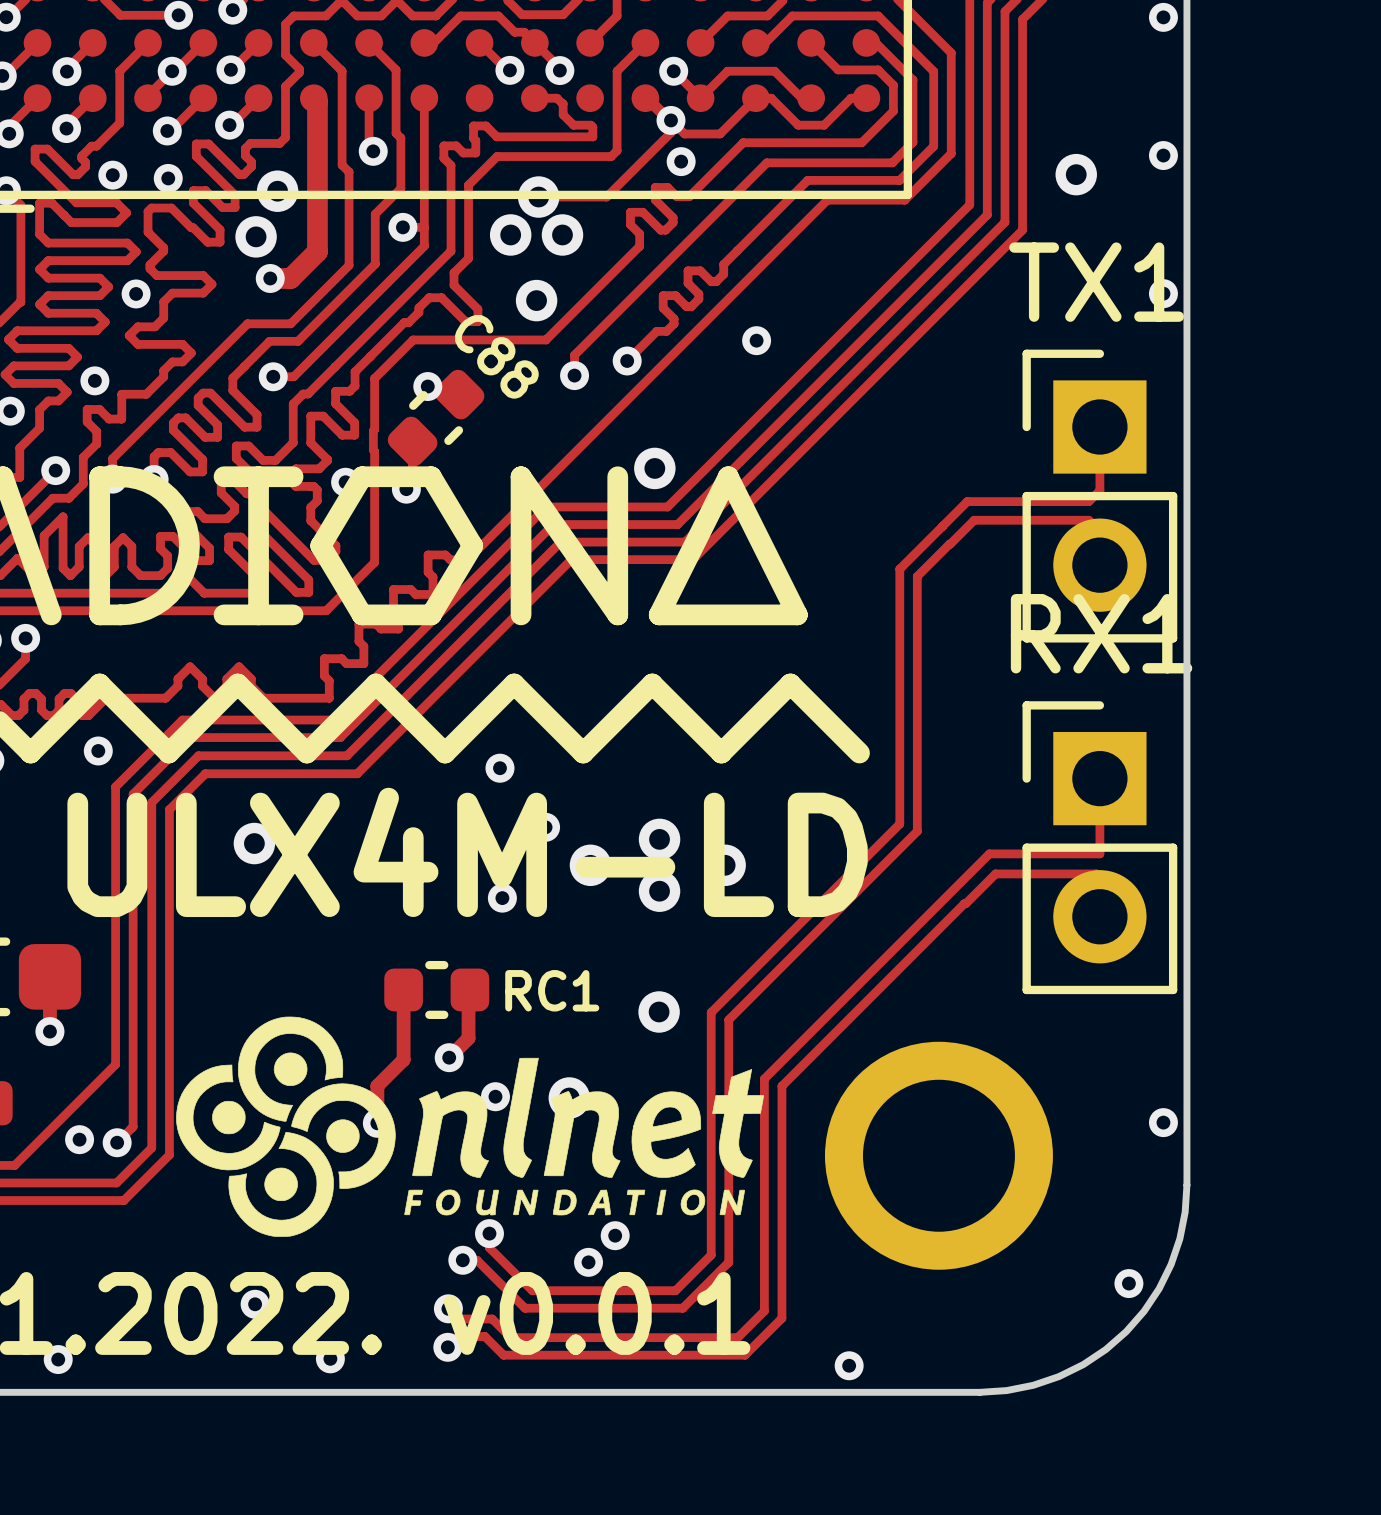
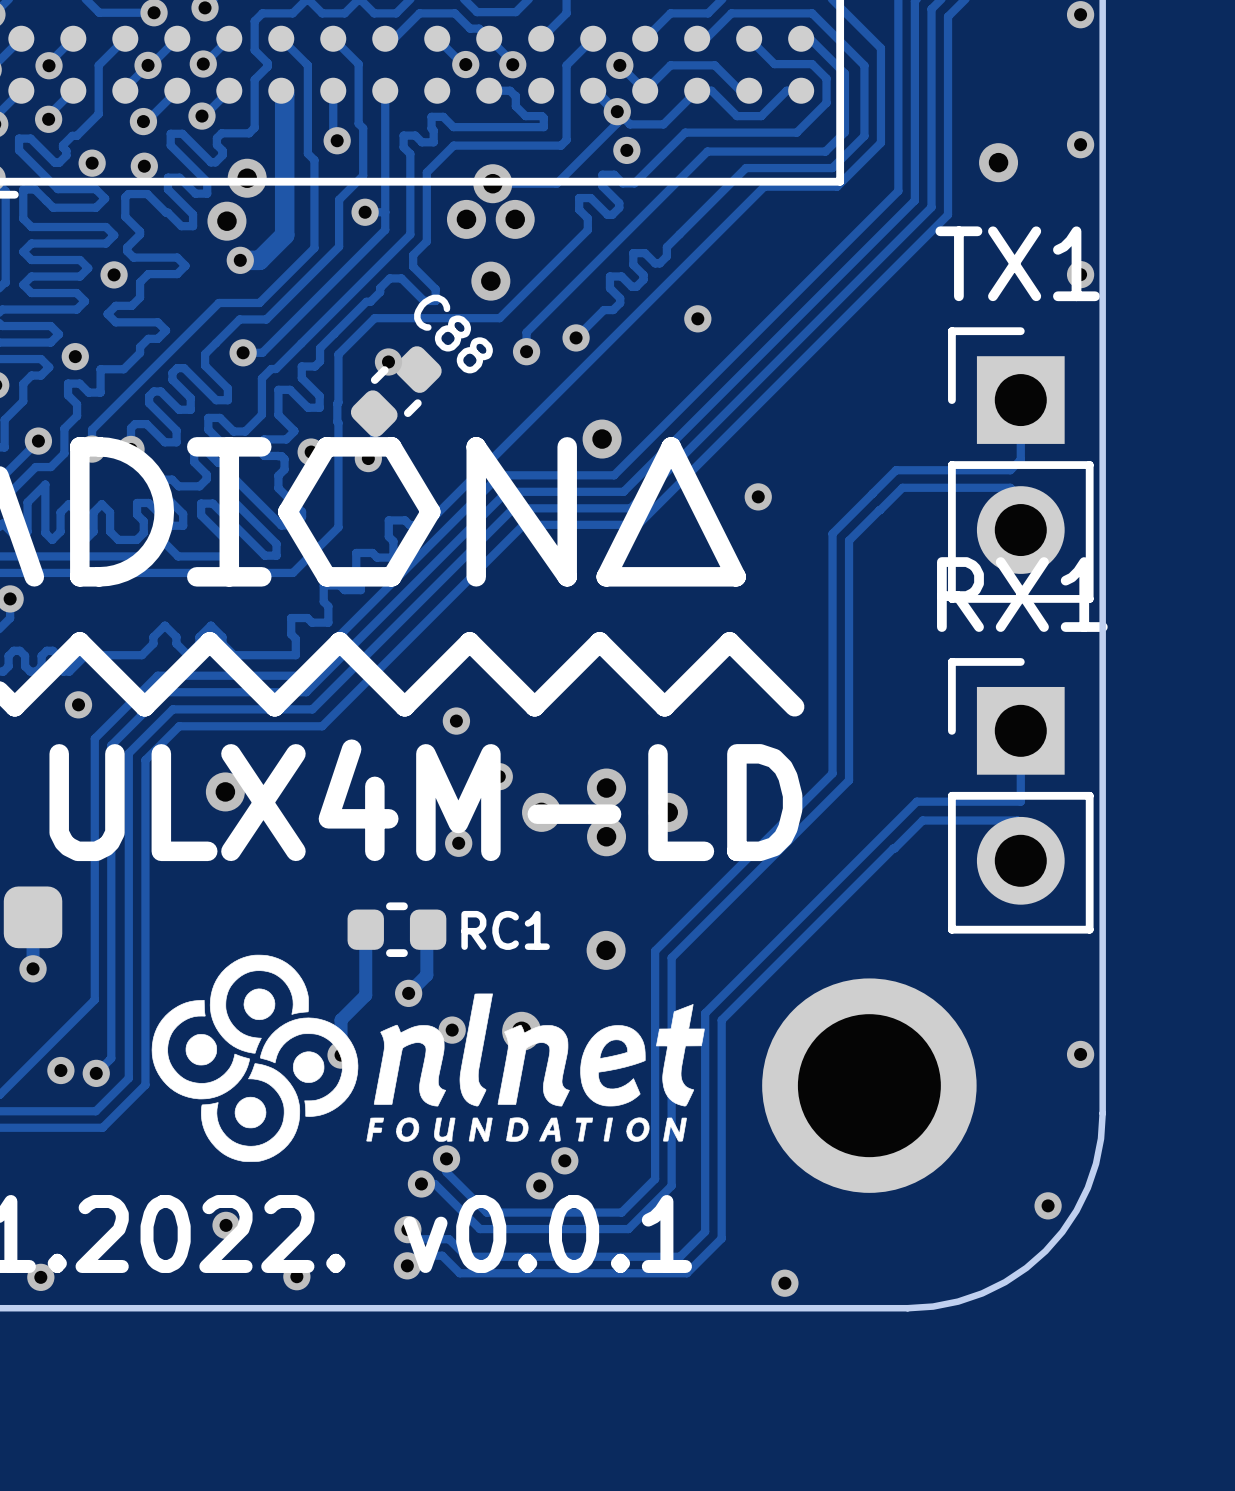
via: none -> (758, 496)

